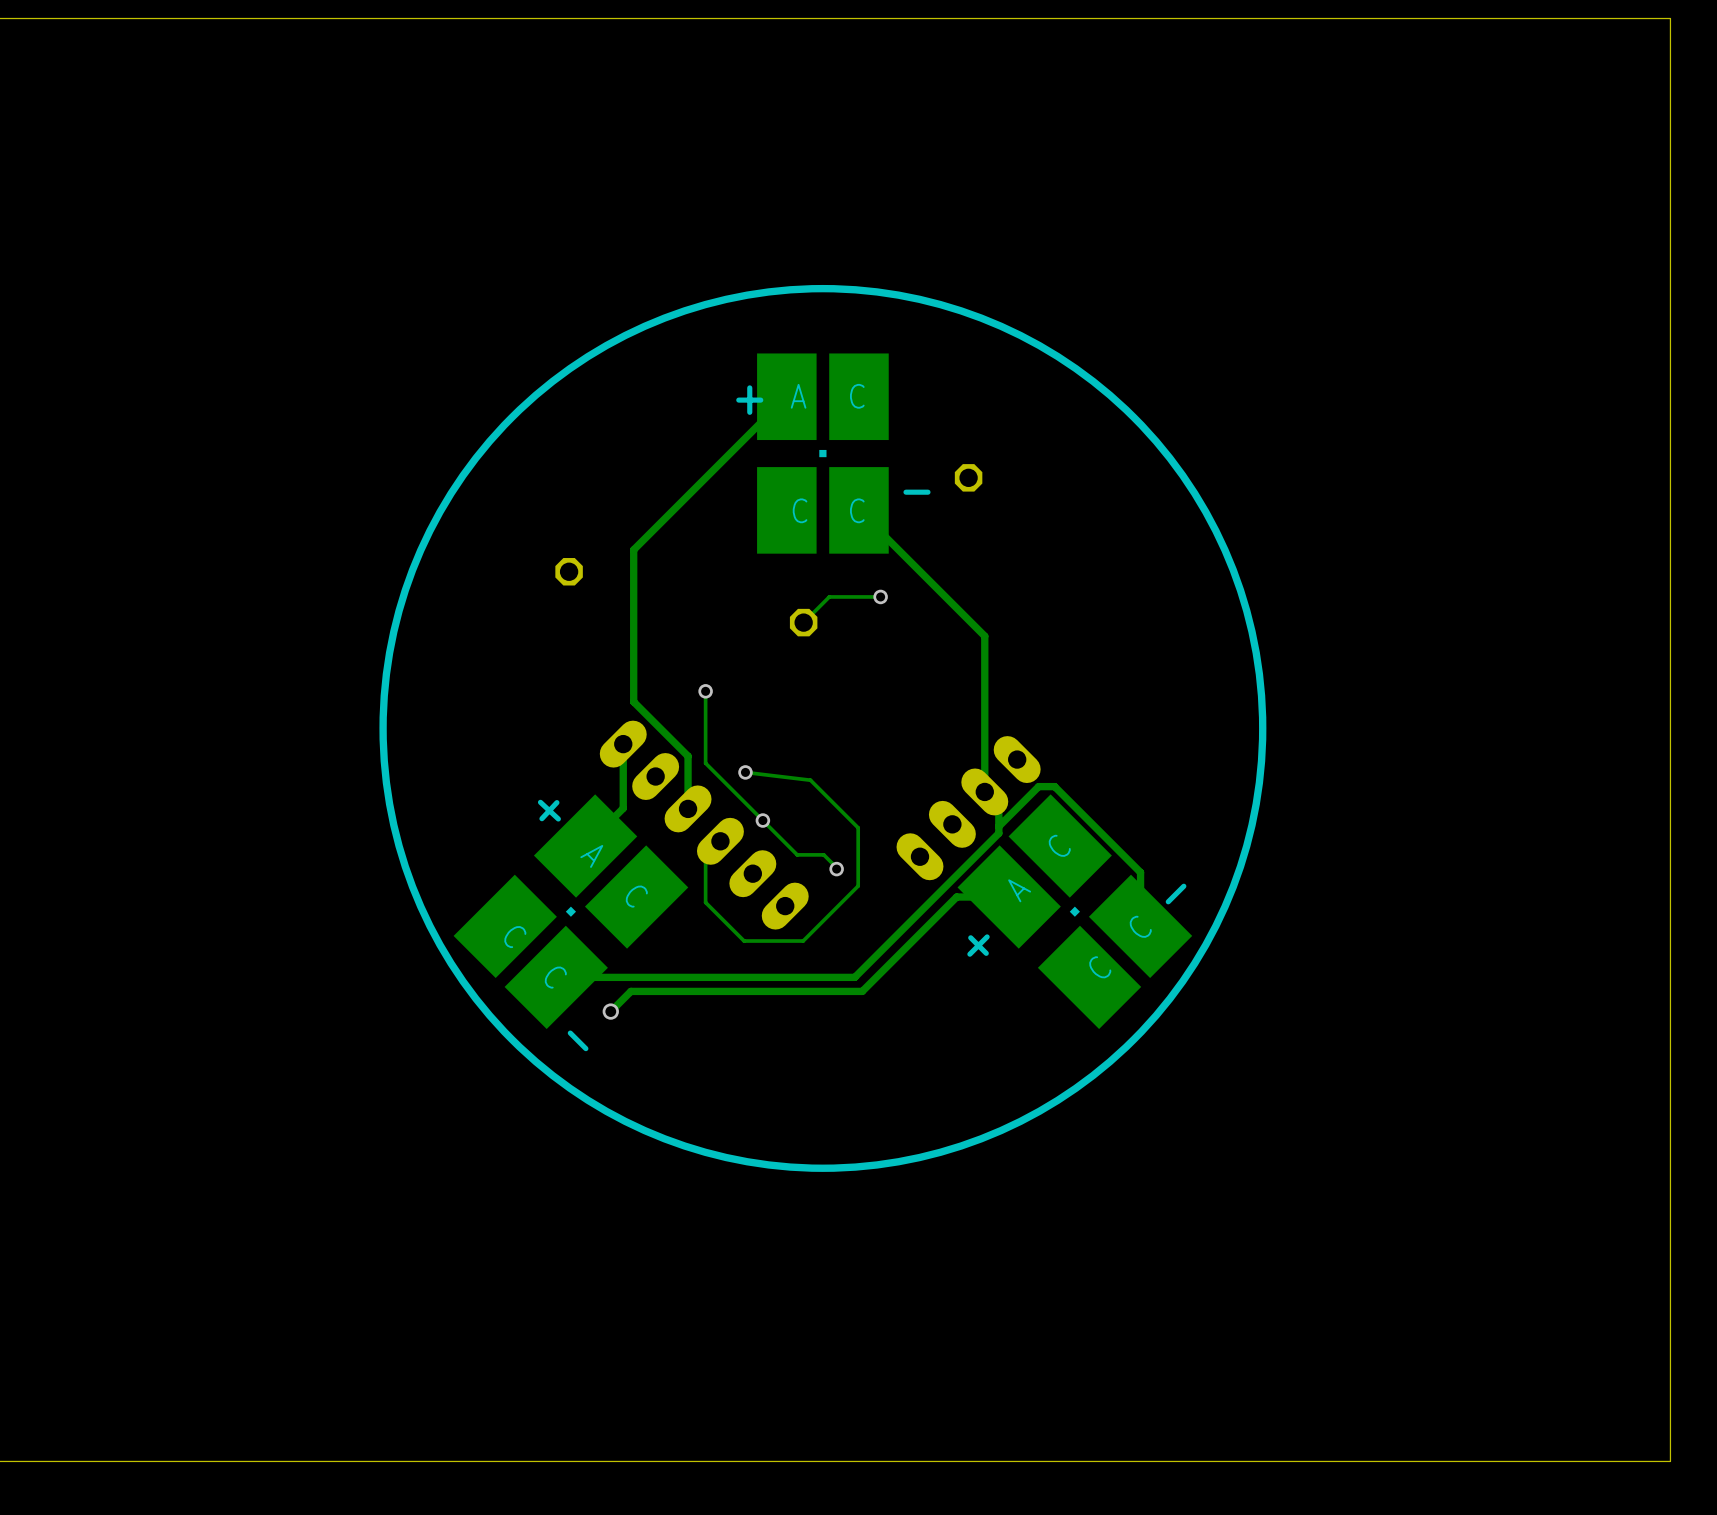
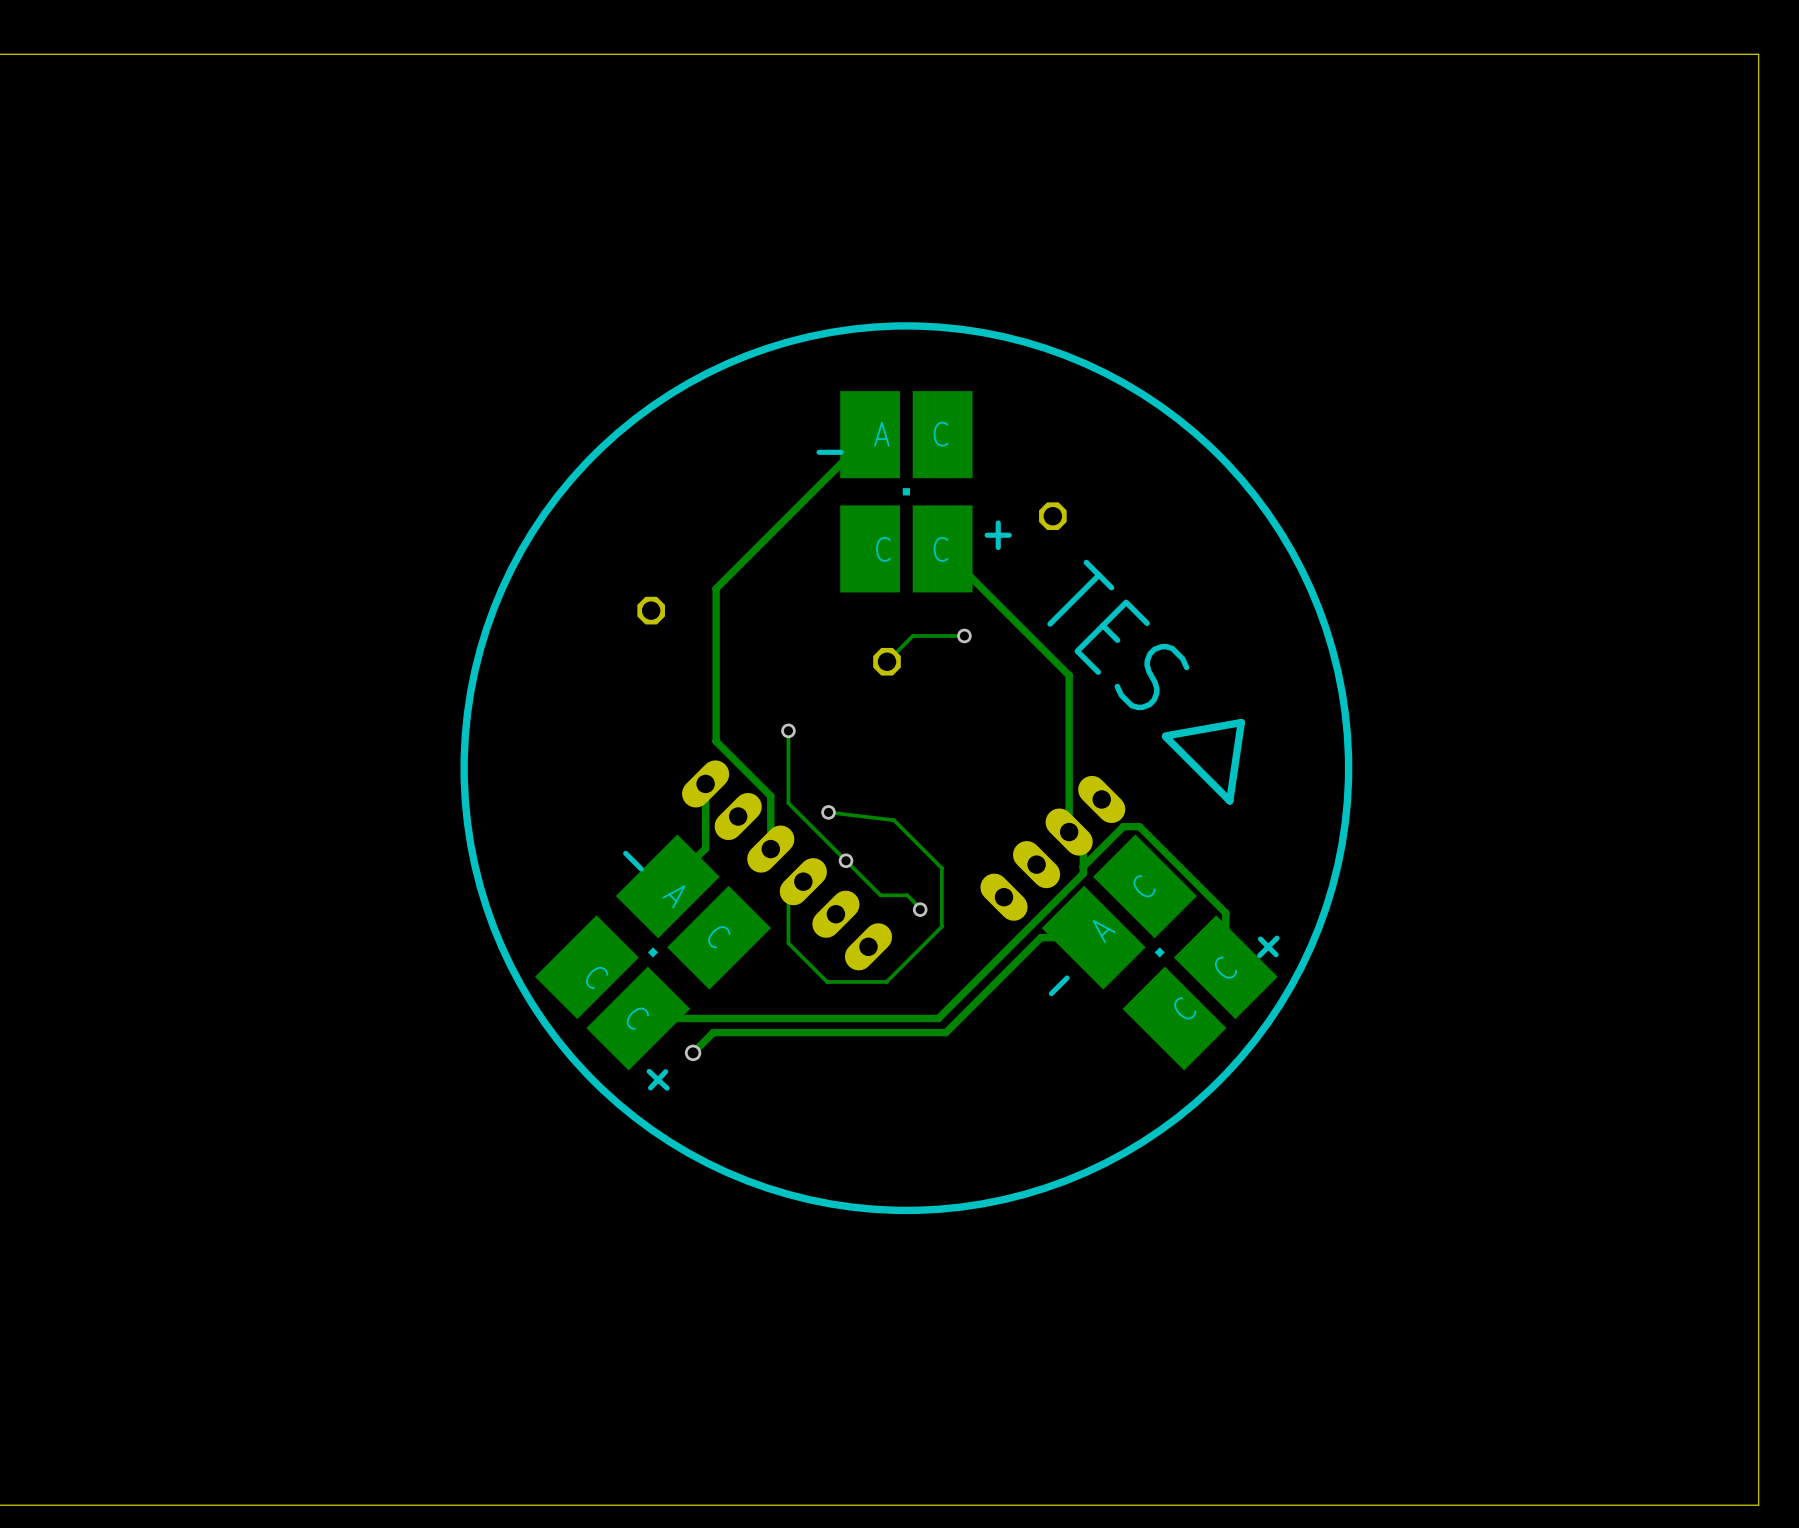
text position: + (749, 400) -> + (998, 535)
text position: - (916, 492) -> - (830, 452)
text: none -> TES (1118, 635)
line: none -> (1165, 735) (1241, 722) (1229, 800) (1165, 736)
text: + (549, 810) -> none
text: none -> - (633, 861)
text: - (1176, 894) -> none
text: none -> + (1268, 946)
text: none -> - (1059, 985)
text: + (978, 945) -> none
text: none -> + (658, 1079)
text: - (578, 1040) -> none

